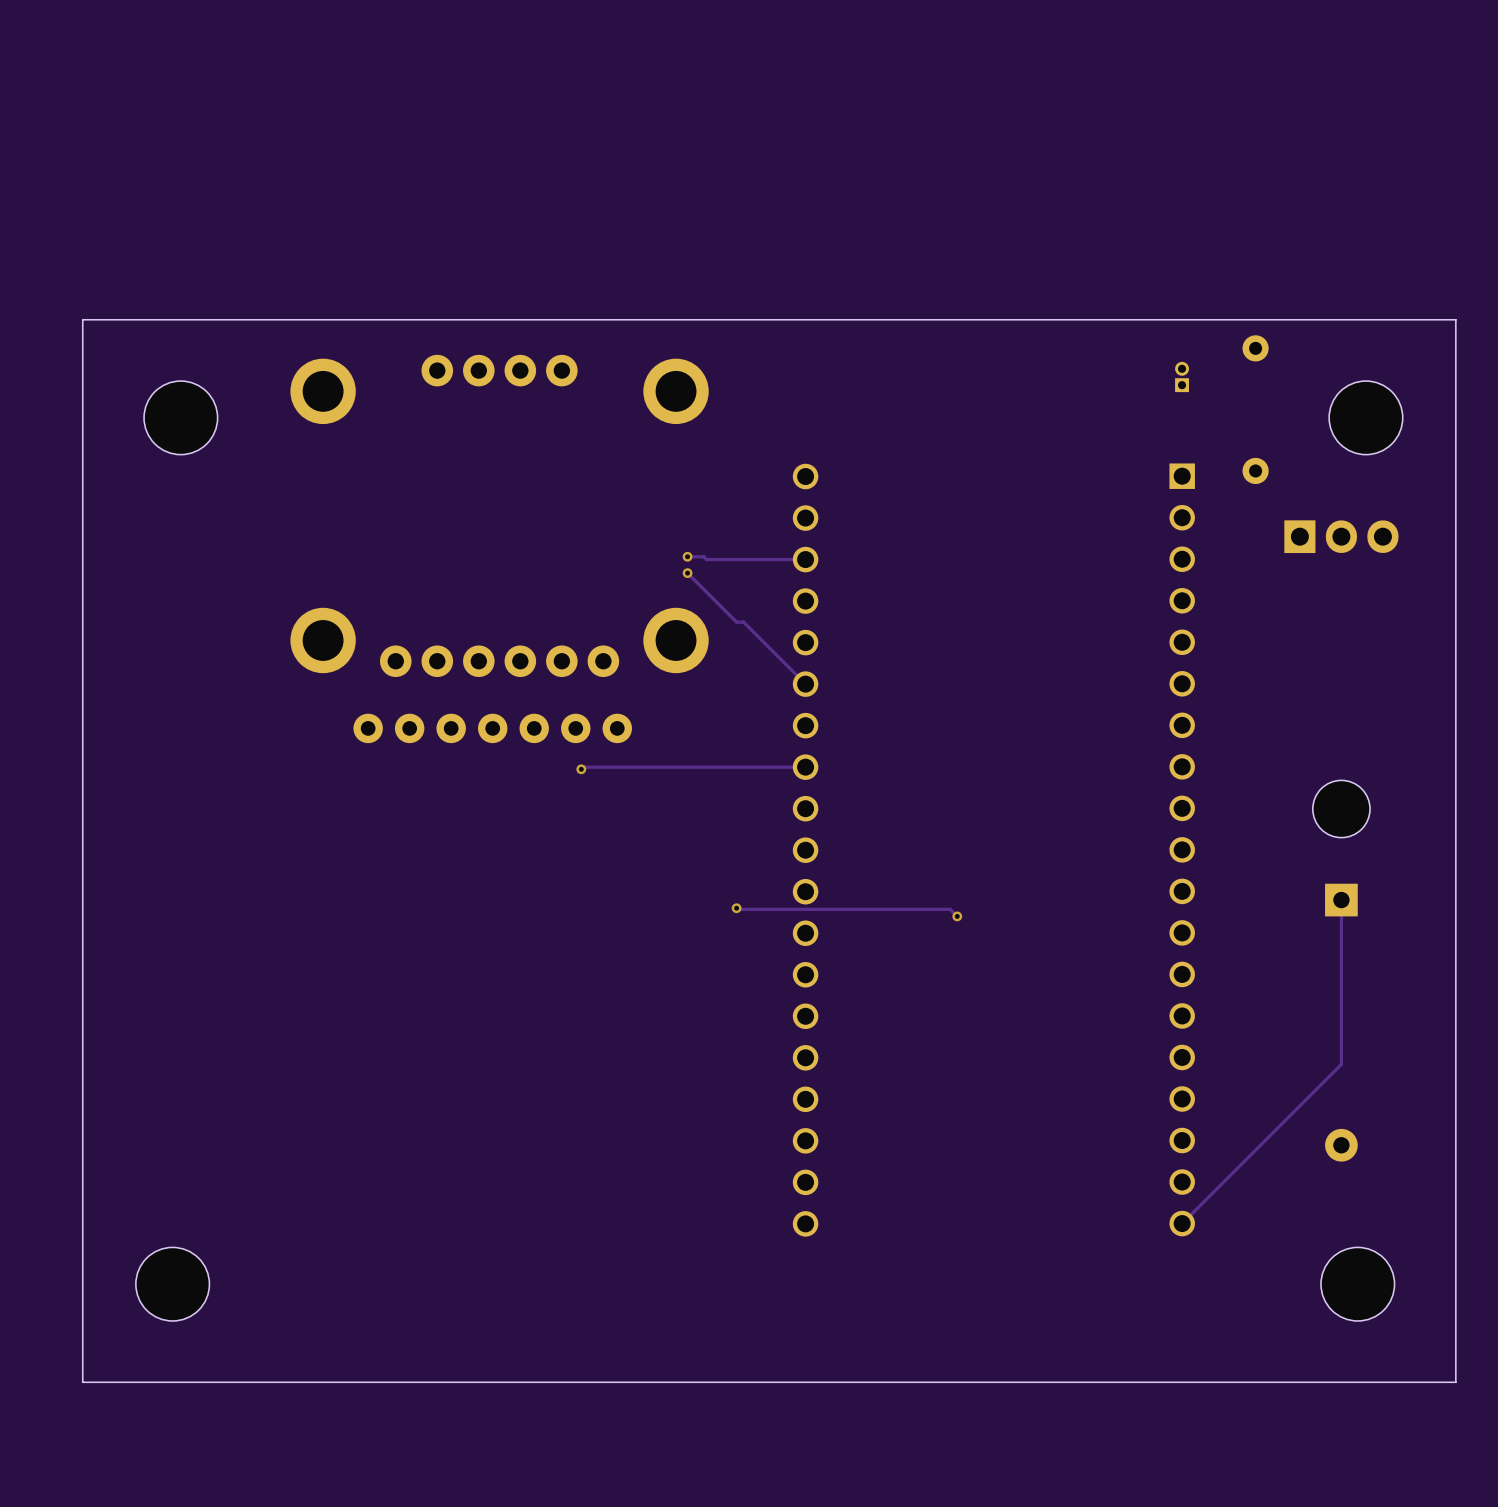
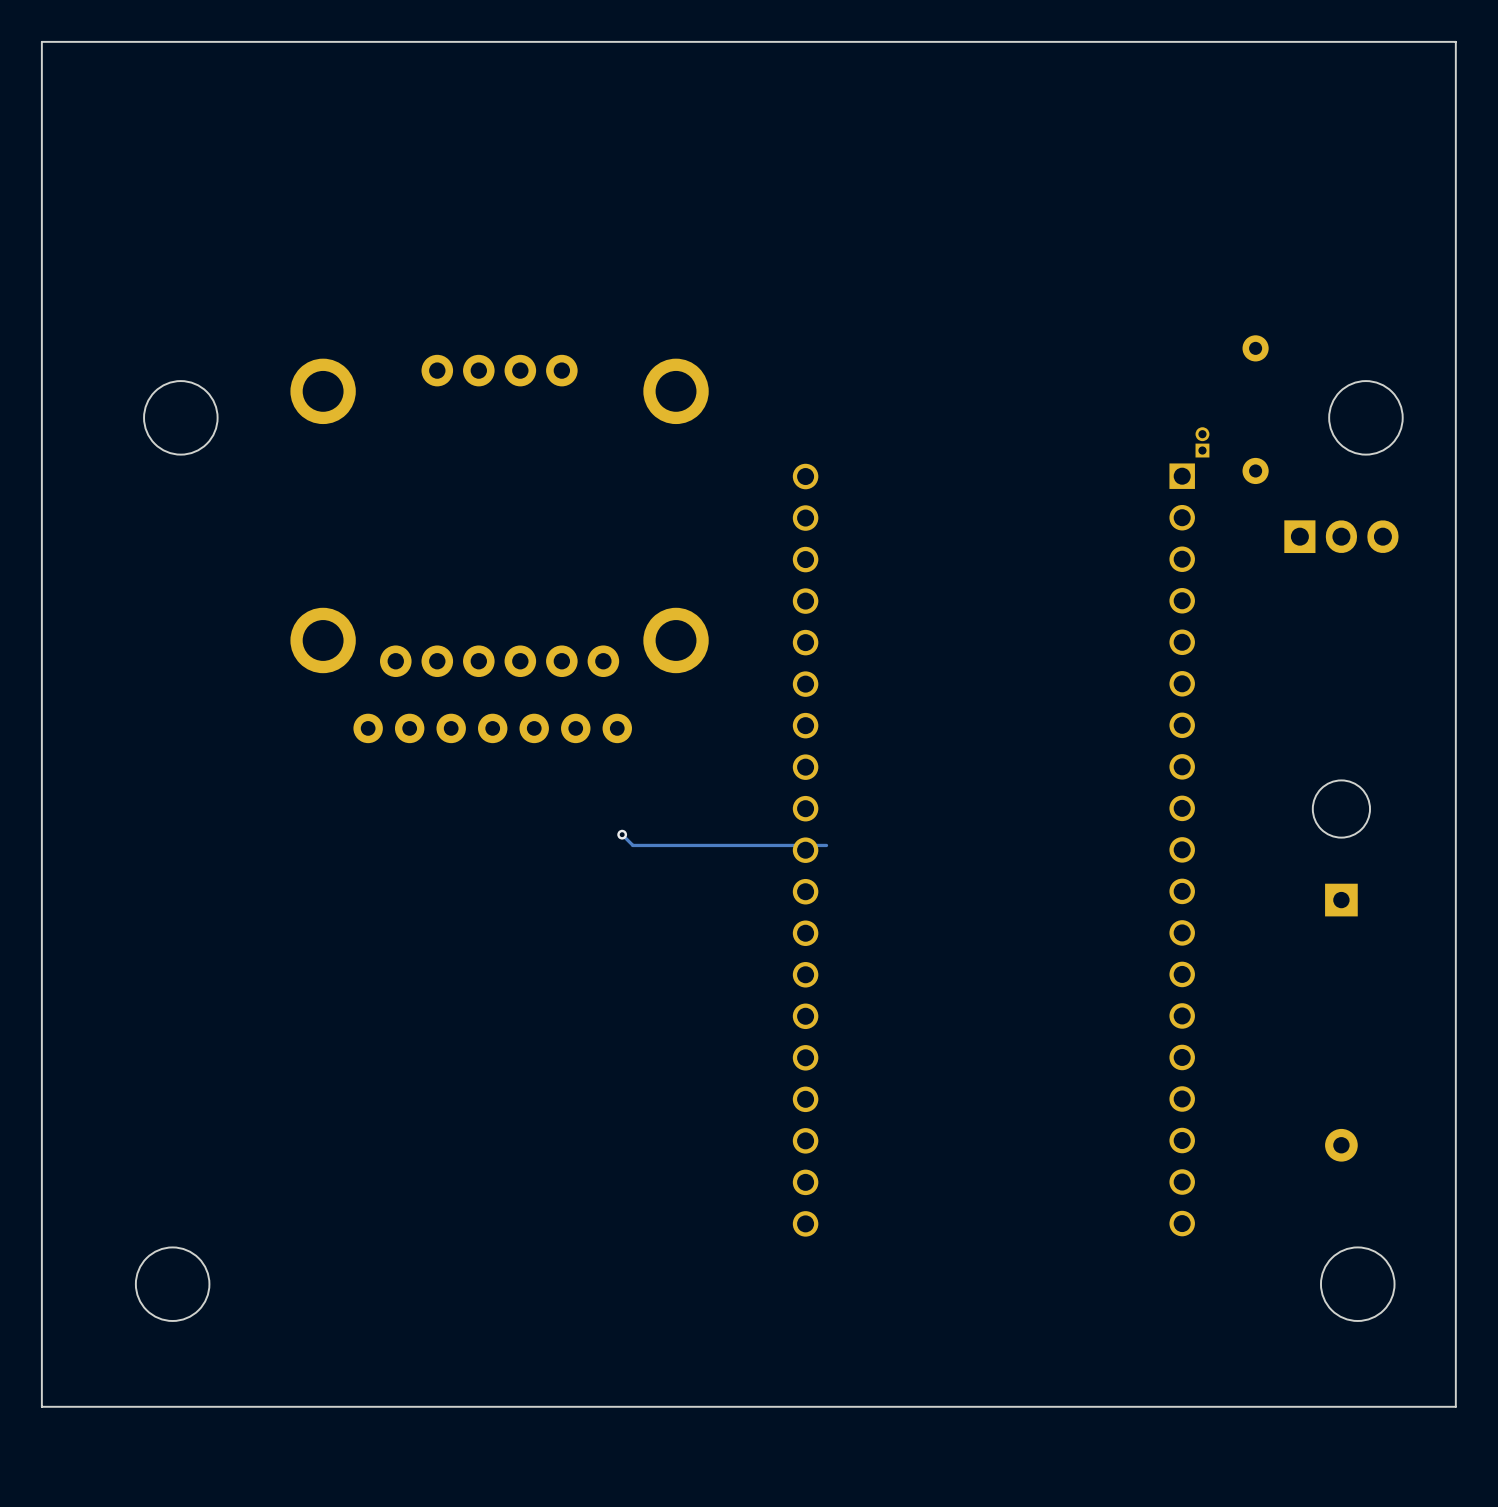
board edge: (1455, 319) (82, 319) (82, 1382) (1455, 1382) -> (1455, 319) (1455, 41) (41, 41) (41, 1406) (1455, 1406) (1455, 1382)
part position: (1182, 376) -> (1202, 442)
track: (687, 556) (703, 556) (706, 559) (805, 559) -> none
via: (687, 556) -> none
track: (687, 573) (736, 622) (743, 622) (805, 684) -> none
via: (687, 573) -> none
track: (805, 767) (583, 767) (581, 769) -> none
via: (581, 769) -> none
track: none -> (622, 834) (632, 845) (826, 845)
via: none -> (622, 834)
track: (1341, 900) (1341, 1064) (1182, 1223) -> none
track: (736, 908) (950, 909) (957, 916) -> none
via: (736, 908) -> none
via: (957, 916) -> none

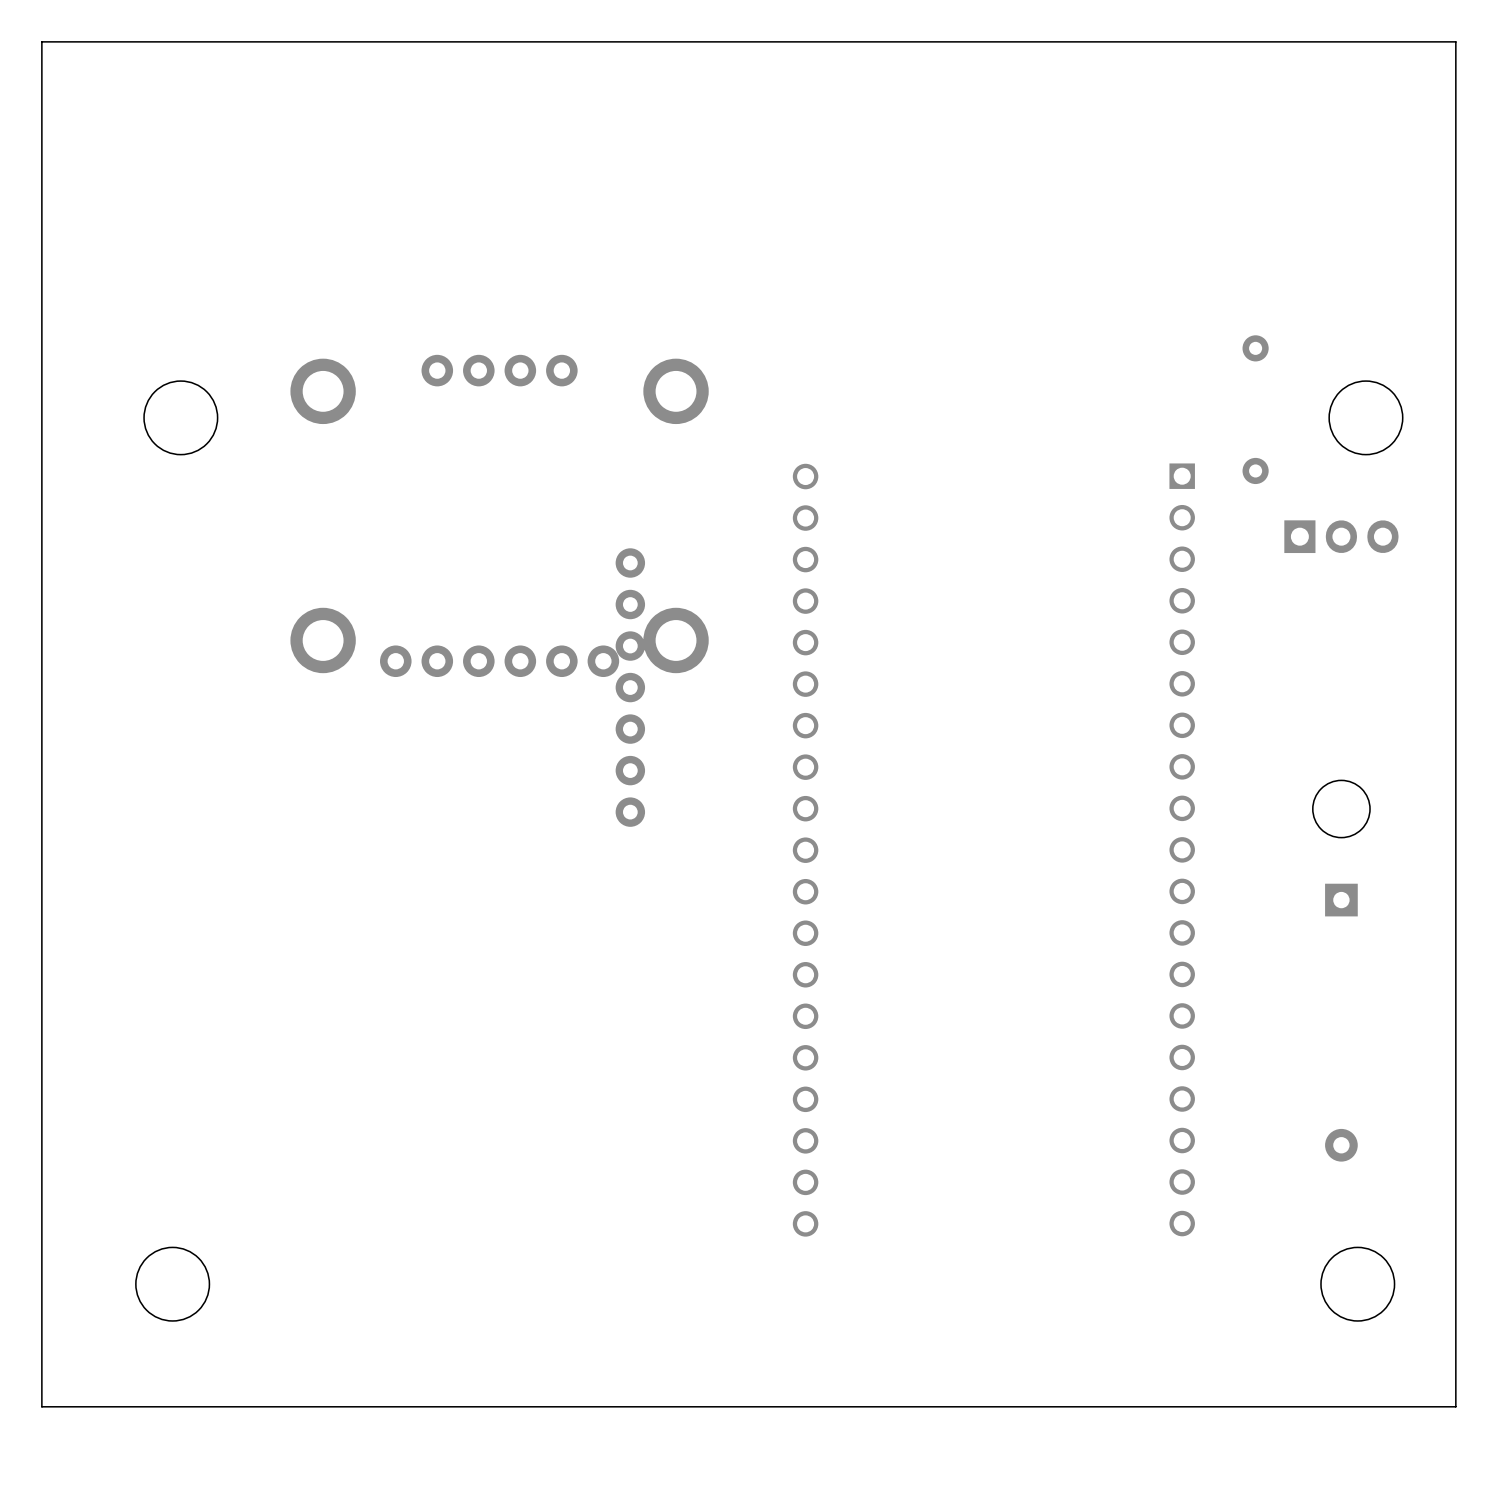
part: (1202, 442) -> none
part rotation: 0° (492, 728) -> 90° clockwise (630, 687)
track: (622, 834) (632, 845) (826, 845) -> none
via: (622, 834) -> none

